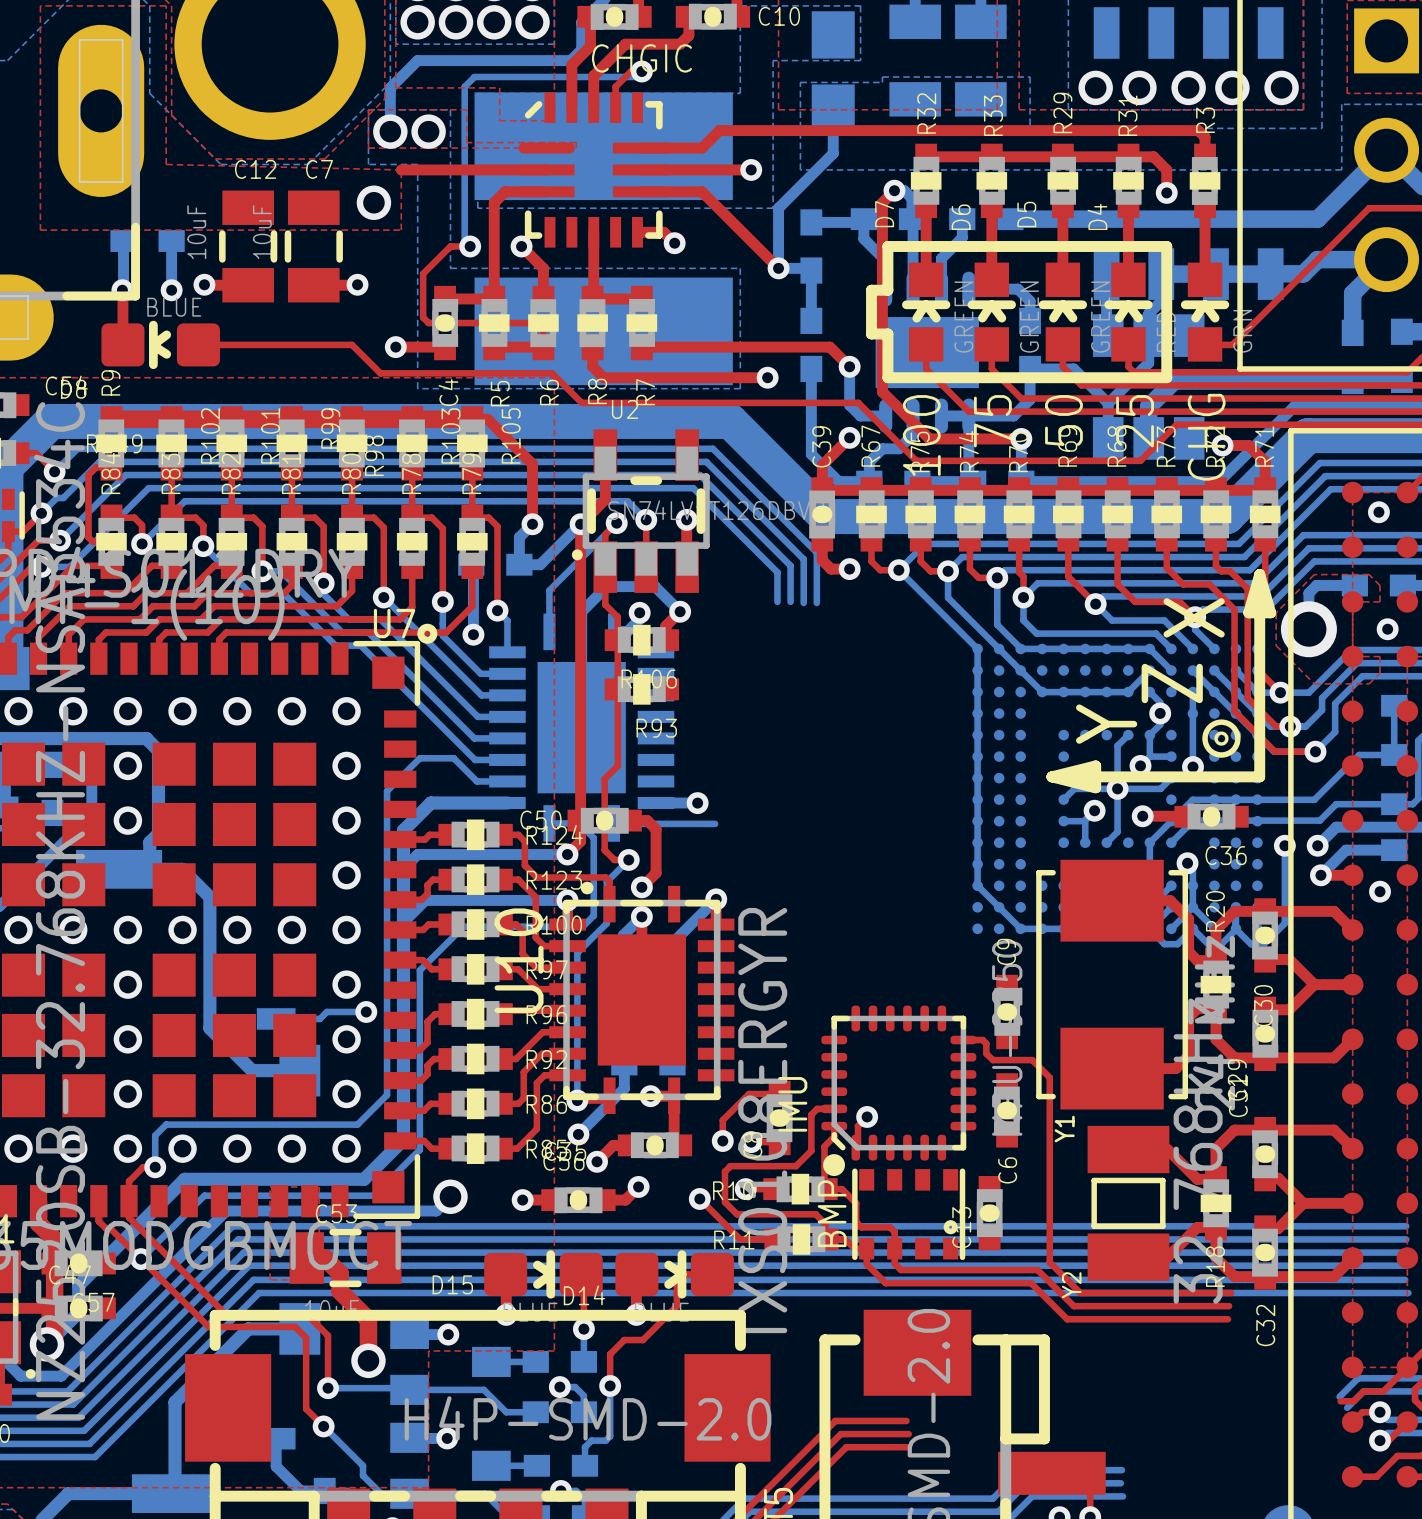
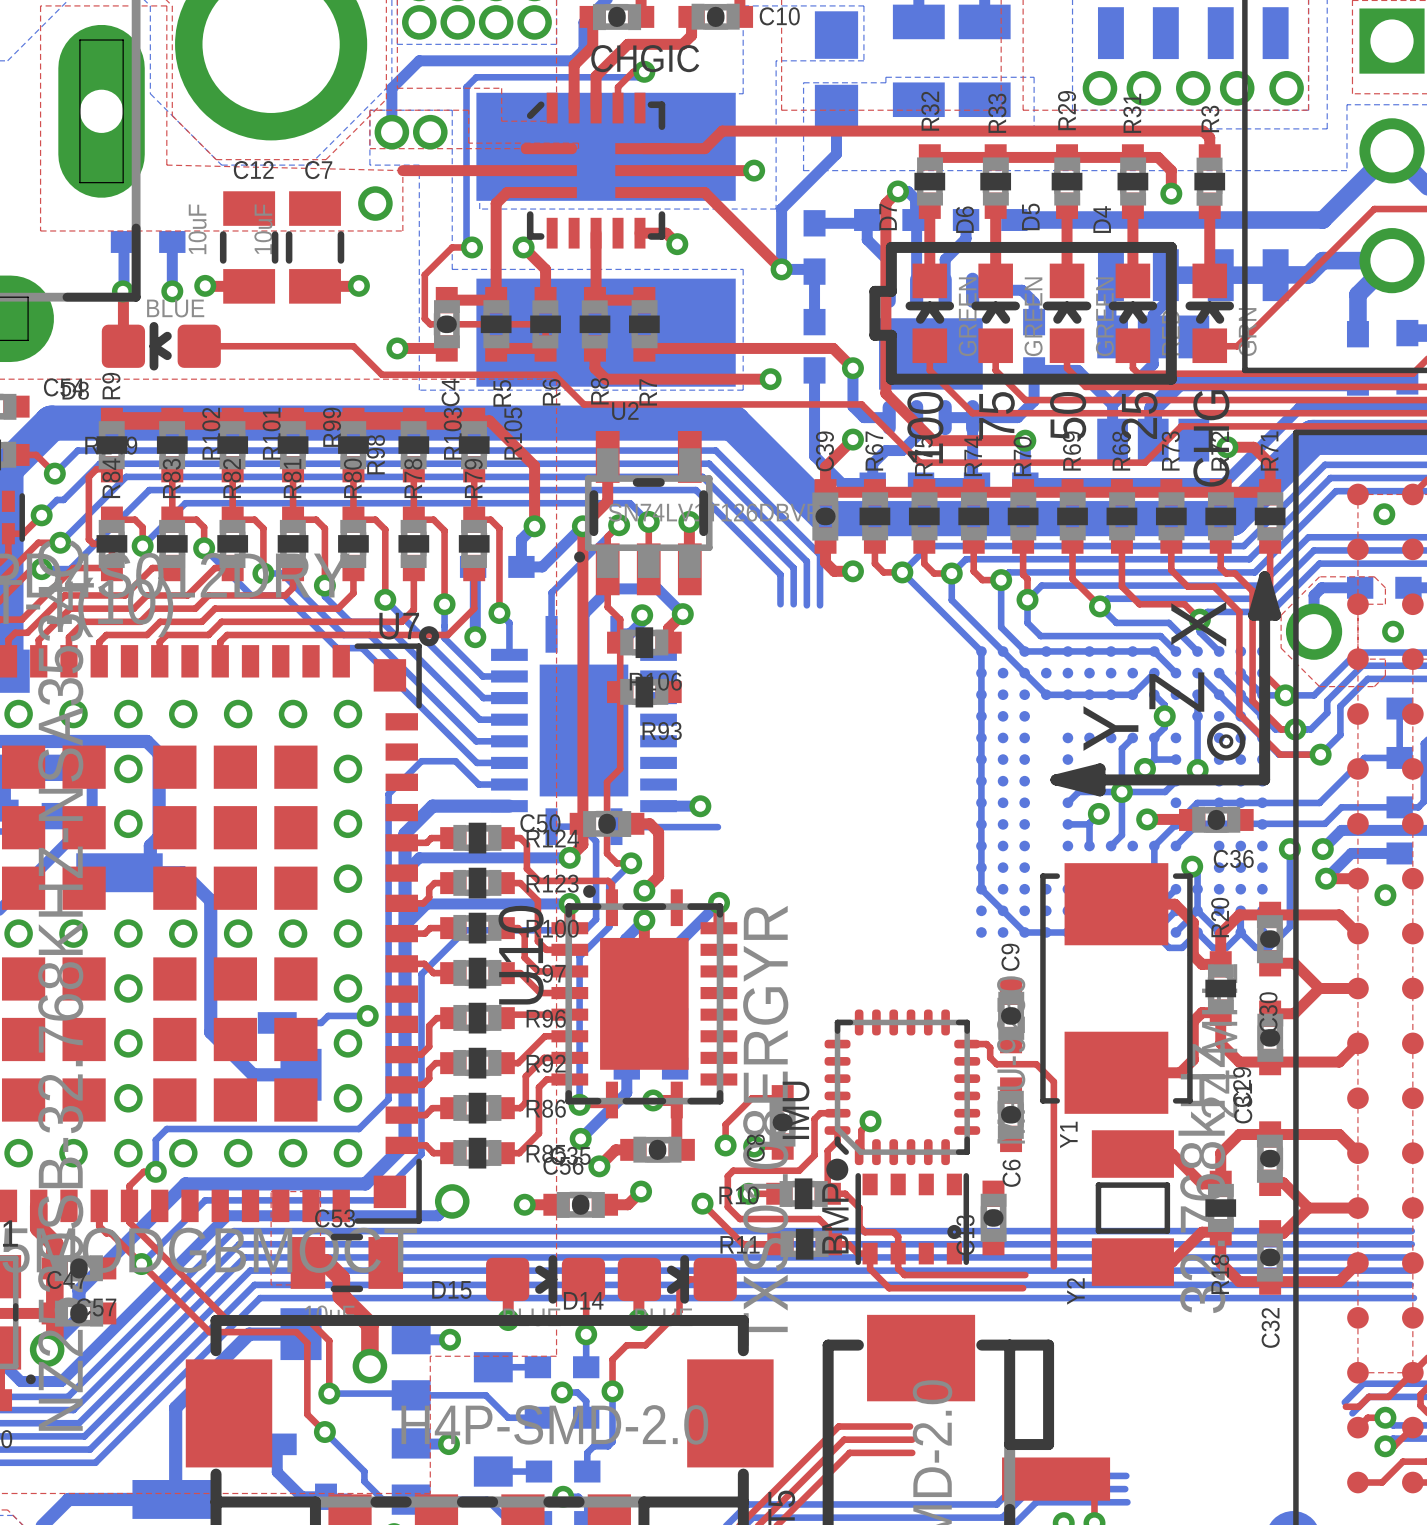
top track: (1049, 1261) (1080, 1293) (1231, 1293) -> none
top track: (1021, 1270) (1037, 1270) (1073, 1306) (1229, 1306) -> none
top track: (1019, 1283) (1031, 1283) (1067, 1319) (1228, 1319) -> none

